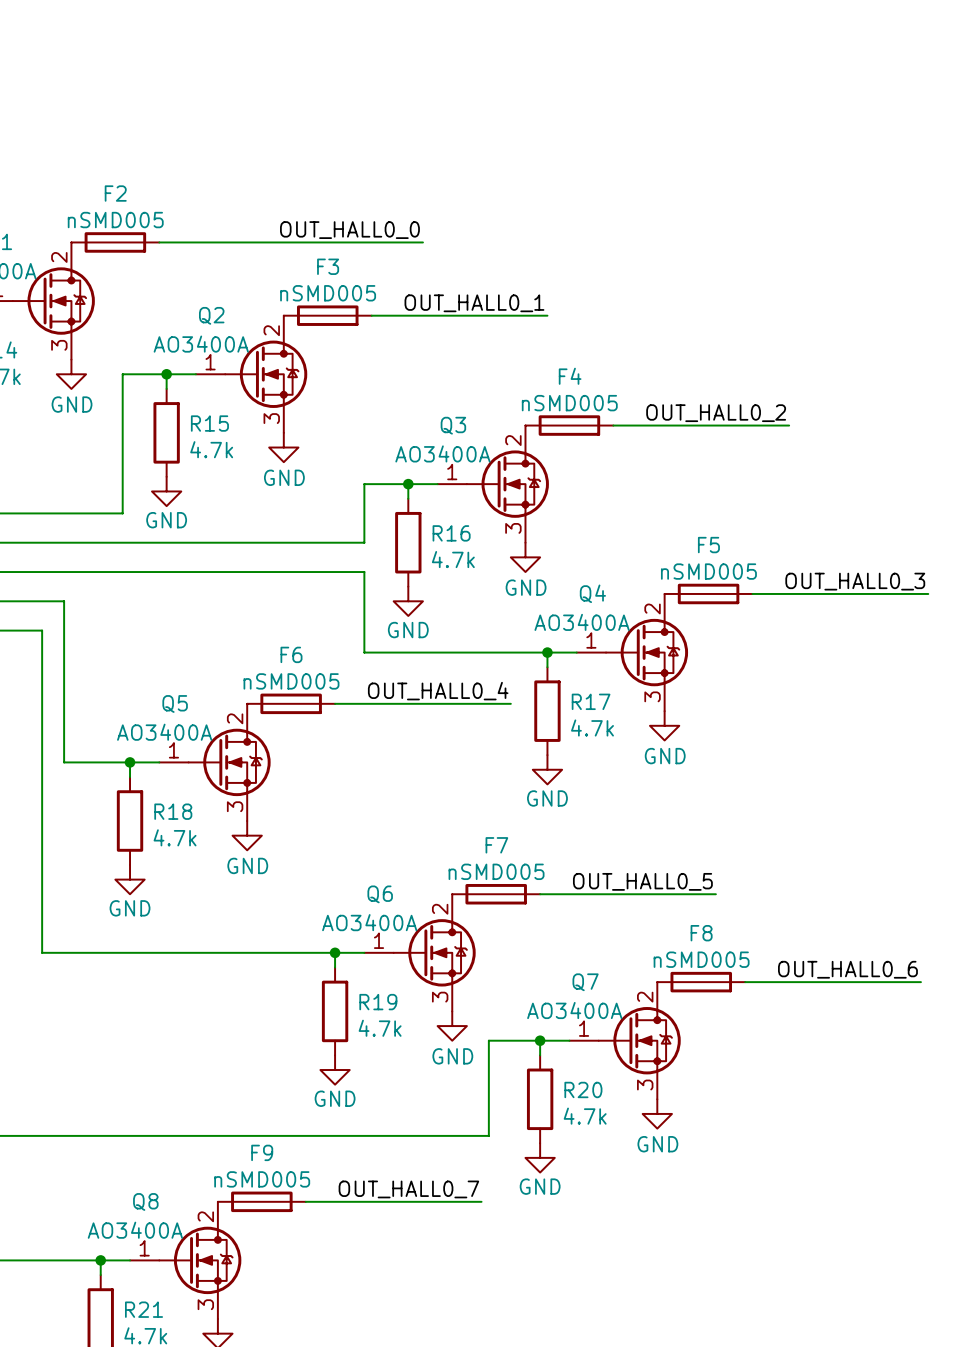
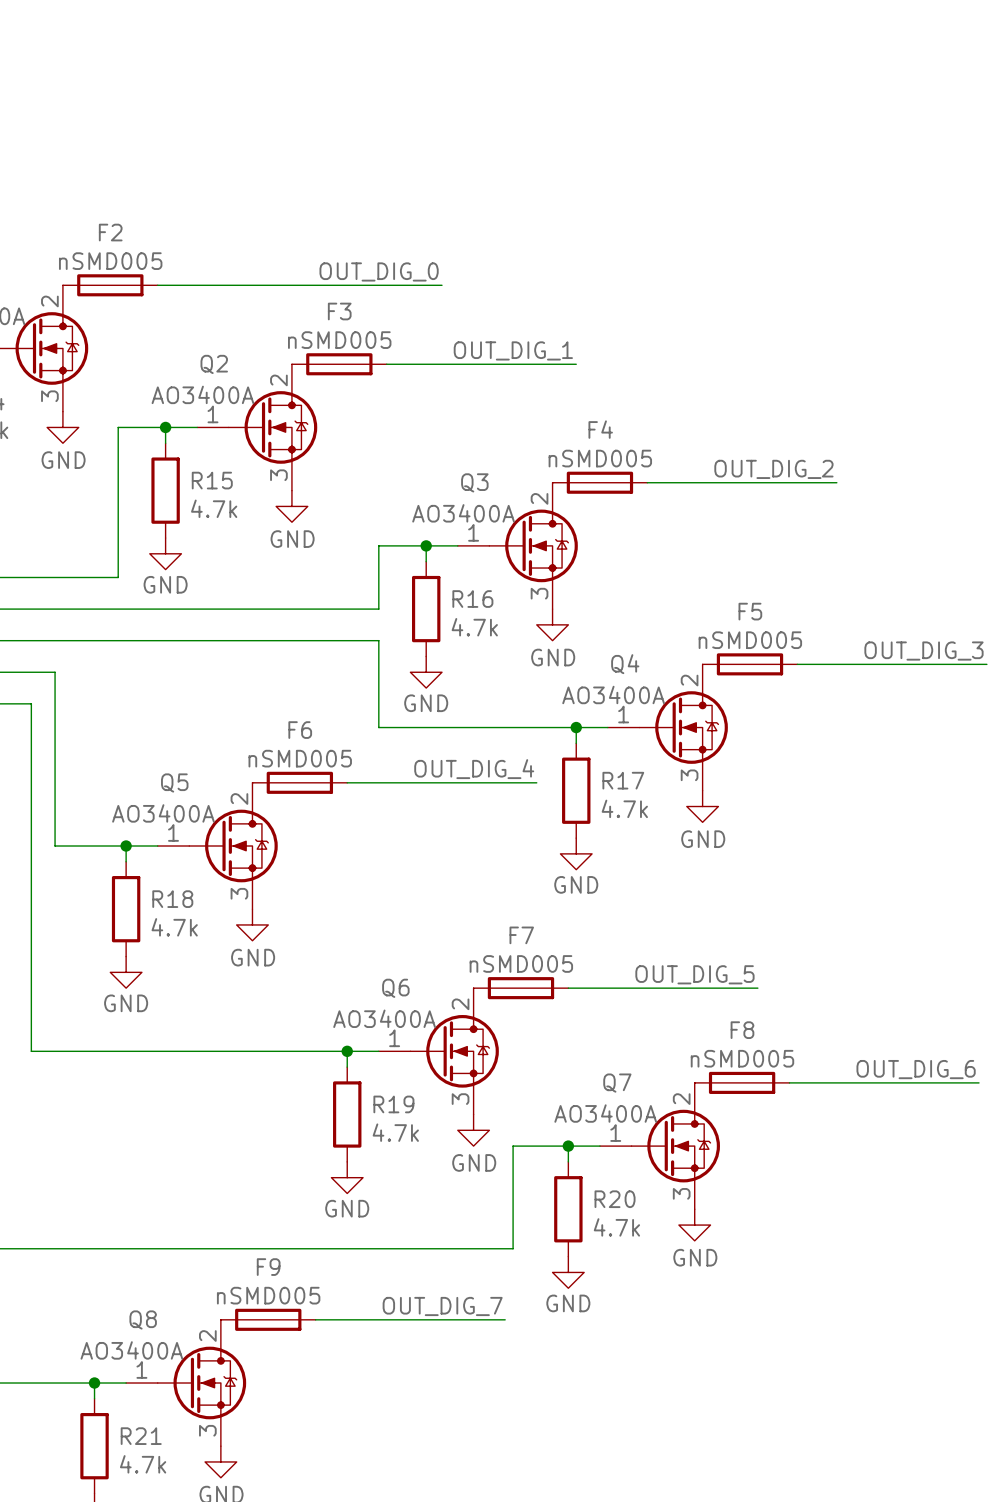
label: OUT_HALL0_0 (349, 230) -> OUT_DIG_0 (379, 271)
label: OUT_HALL0_1 (474, 303) -> OUT_DIG_1 (513, 350)
label: OUT_HALL0_2 (716, 413) -> OUT_DIG_2 (773, 469)
label: OUT_HALL0_3 (855, 581) -> OUT_DIG_3 (923, 651)
label: OUT_HALL0_4 (438, 691) -> OUT_DIG_4 (474, 769)
label: OUT_HALL0_5 (642, 881) -> OUT_DIG_5 (694, 974)
label: OUT_HALL0_6 (847, 969) -> OUT_DIG_6 (916, 1069)
label: OUT_HALL0_7 (408, 1189) -> OUT_DIG_7 (442, 1306)

